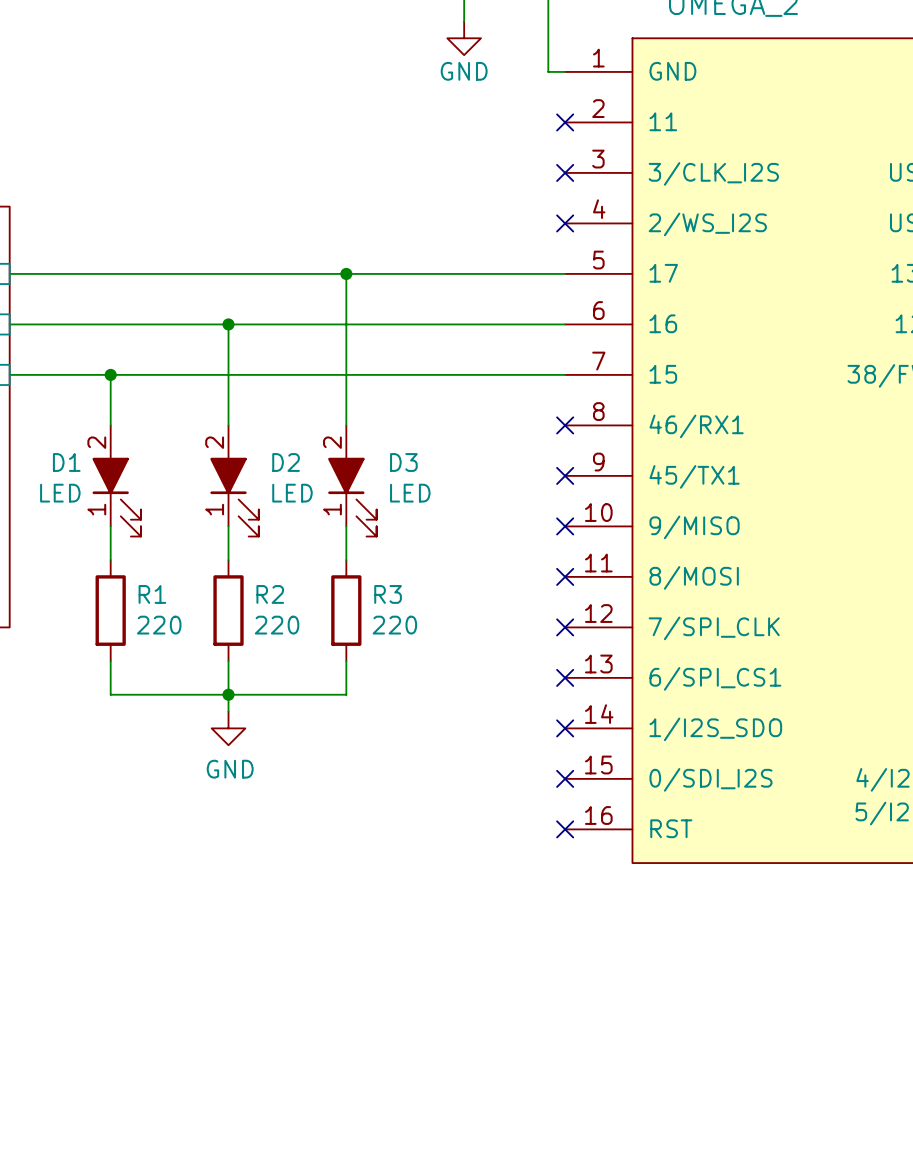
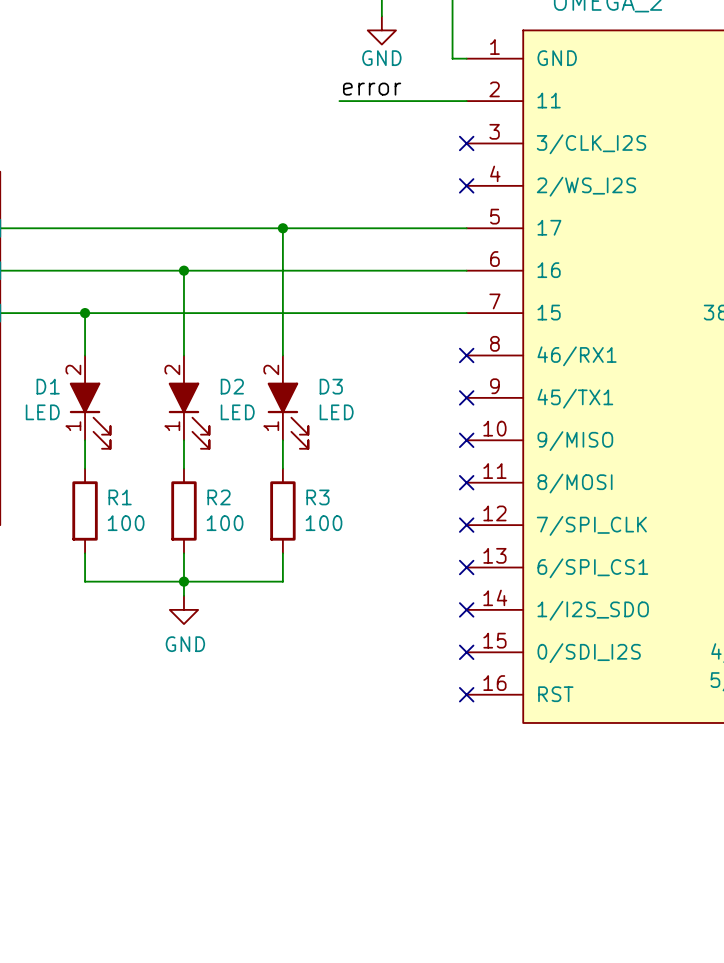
label: none -> error (372, 89)
wire: none -> (339, 101) (466, 101)
no-connect mark: (565, 122) -> none
R1 value: 220 (159, 625) -> 100 (126, 523)
R2 value: 220 (277, 625) -> 100 (225, 523)
R3 value: 220 (394, 625) -> 100 (324, 523)

